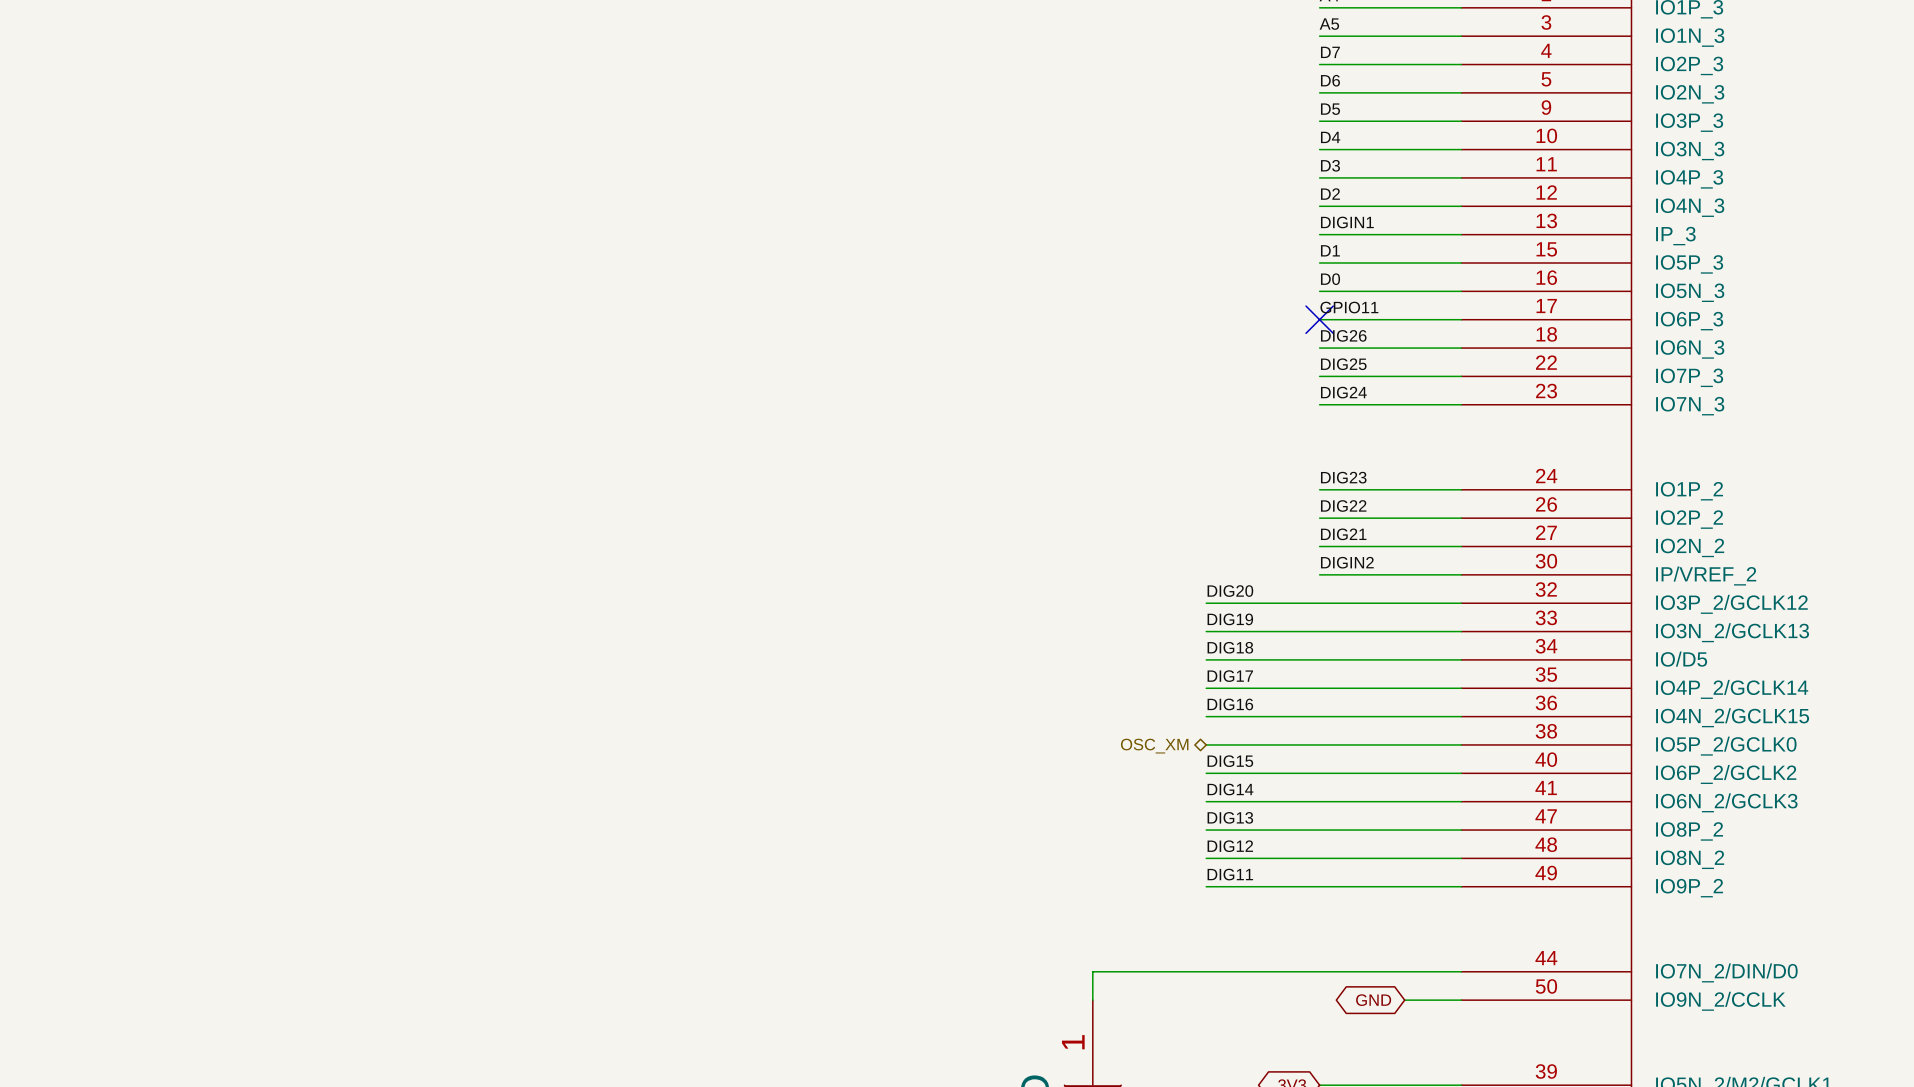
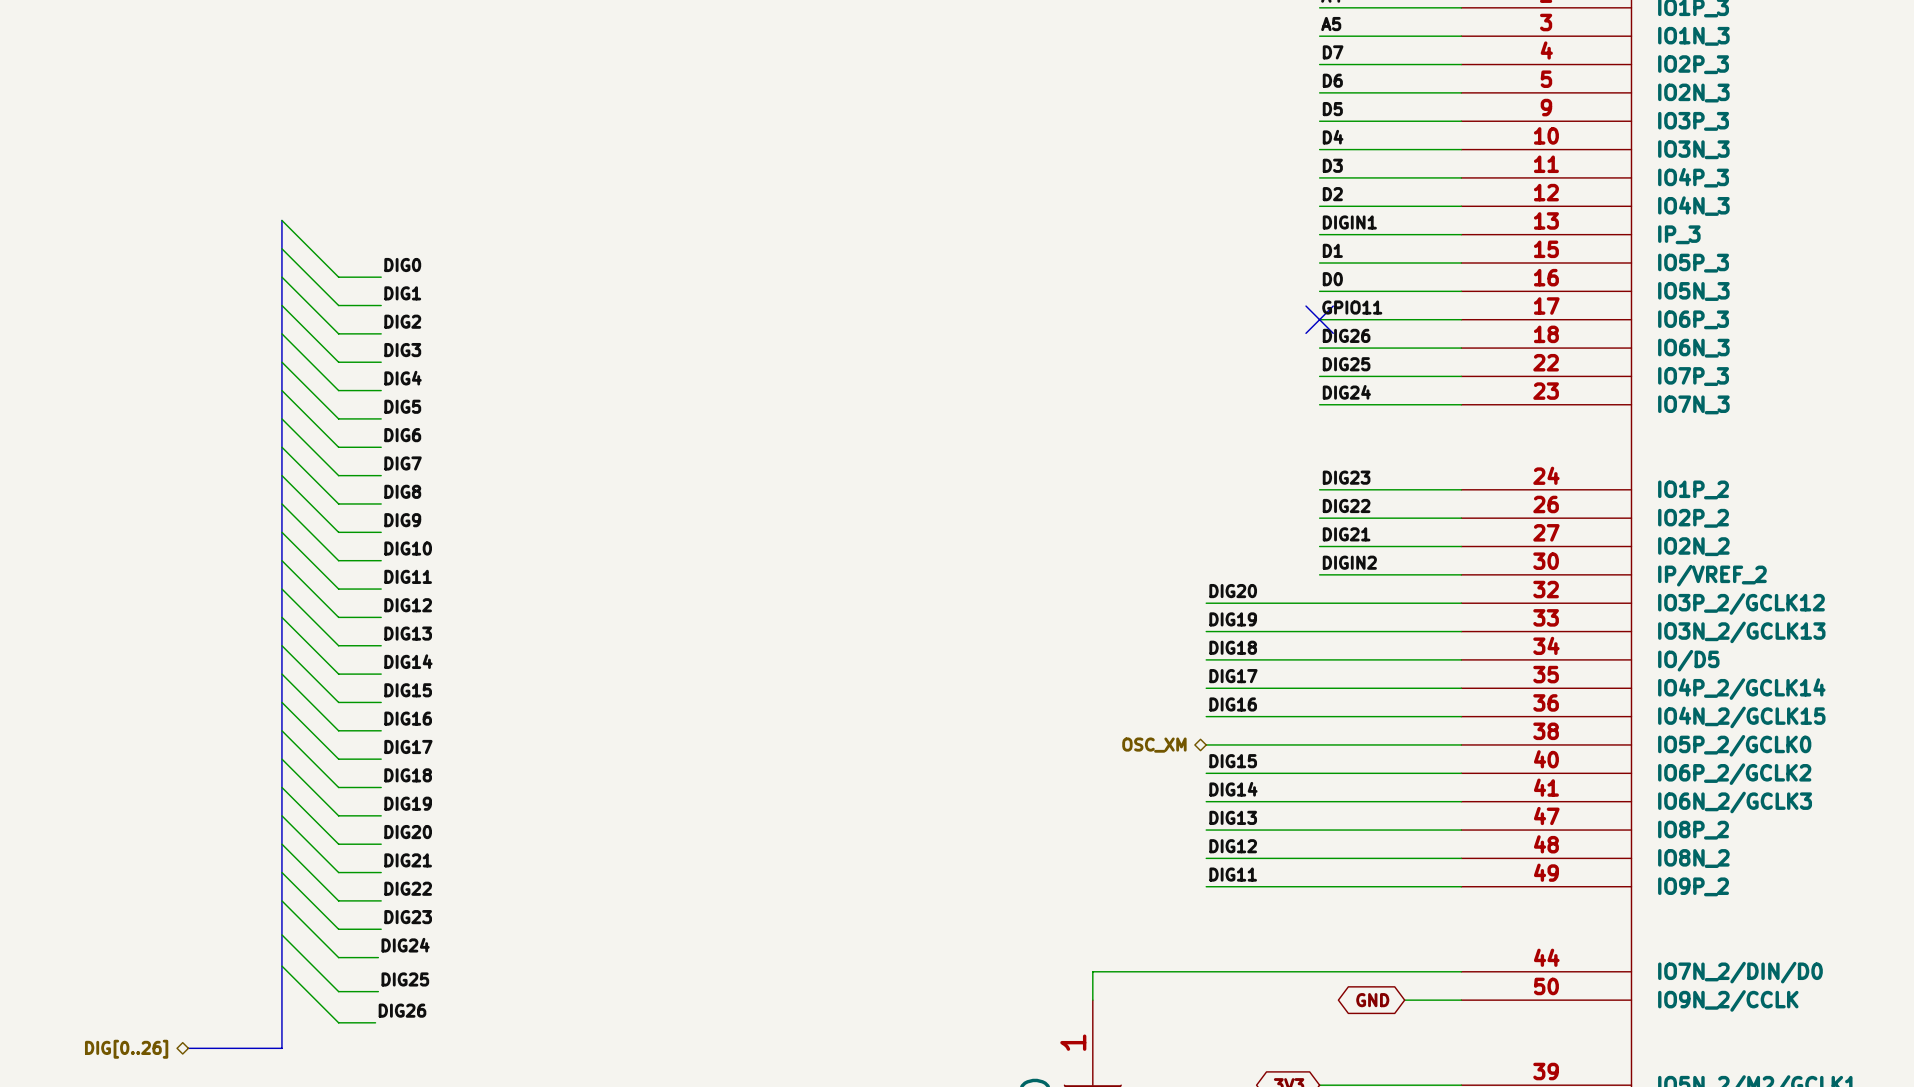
wire: none -> (281, 220) (338, 277) (381, 277)
bus: none -> (281, 220) (281, 1048) (188, 1048)
wire: none -> (281, 248) (338, 305) (381, 305)
label: none -> DIG0 (402, 265)
wire: none -> (281, 277) (338, 333) (381, 333)
label: none -> DIG1 (402, 293)
wire: none -> (281, 305) (338, 362) (381, 362)
label: none -> DIG2 (402, 321)
wire: none -> (281, 333) (338, 390) (381, 390)
label: none -> DIG3 (402, 350)
wire: none -> (281, 362) (338, 418) (381, 418)
label: none -> DIG4 (403, 378)
wire: none -> (281, 390) (338, 447) (381, 447)
label: none -> DIG5 (402, 406)
wire: none -> (281, 418) (338, 475) (381, 475)
label: none -> DIG6 (402, 435)
wire: none -> (281, 447) (338, 503) (381, 503)
label: none -> DIG7 (403, 463)
wire: none -> (281, 475) (338, 532) (381, 532)
label: none -> DIG8 (402, 491)
wire: none -> (281, 503) (338, 560) (381, 560)
label: none -> DIG9 (402, 520)
wire: none -> (281, 532) (338, 589) (381, 589)
label: none -> DIG10 (408, 548)
wire: none -> (281, 560) (338, 617) (381, 617)
label: none -> DIG11 (408, 576)
wire: none -> (281, 589) (338, 645) (381, 645)
label: none -> DIG12 (408, 605)
wire: none -> (281, 617) (338, 674) (381, 674)
label: none -> DIG13 (408, 633)
wire: none -> (281, 645) (338, 702) (381, 702)
label: none -> DIG14 (408, 661)
wire: none -> (281, 674) (338, 730) (381, 730)
label: none -> DIG15 (408, 690)
wire: none -> (281, 702) (338, 759) (381, 759)
label: none -> DIG16 (408, 718)
wire: none -> (281, 730) (338, 787) (381, 787)
label: none -> DIG17 (408, 746)
wire: none -> (281, 759) (338, 815) (381, 815)
label: none -> DIG18 (408, 775)
wire: none -> (281, 787) (338, 844) (381, 844)
label: none -> DIG19 (408, 803)
wire: none -> (281, 815) (338, 872) (381, 872)
label: none -> DIG20 (408, 832)
wire: none -> (281, 844) (338, 900) (381, 900)
label: none -> DIG21 (408, 860)
wire: none -> (281, 872) (338, 929) (381, 929)
label: none -> DIG22 (408, 888)
wire: none -> (281, 900) (338, 957) (378, 957)
label: none -> DIG23 (408, 917)
wire: none -> (281, 934) (338, 991) (378, 991)
label: none -> DIG24 (405, 945)
wire: none -> (281, 966) (338, 1022) (375, 1022)
label: none -> DIG25 (405, 979)
label: none -> DIG26 (402, 1010)
hierarchical label: none -> DIG[0..26] (126, 1049)

